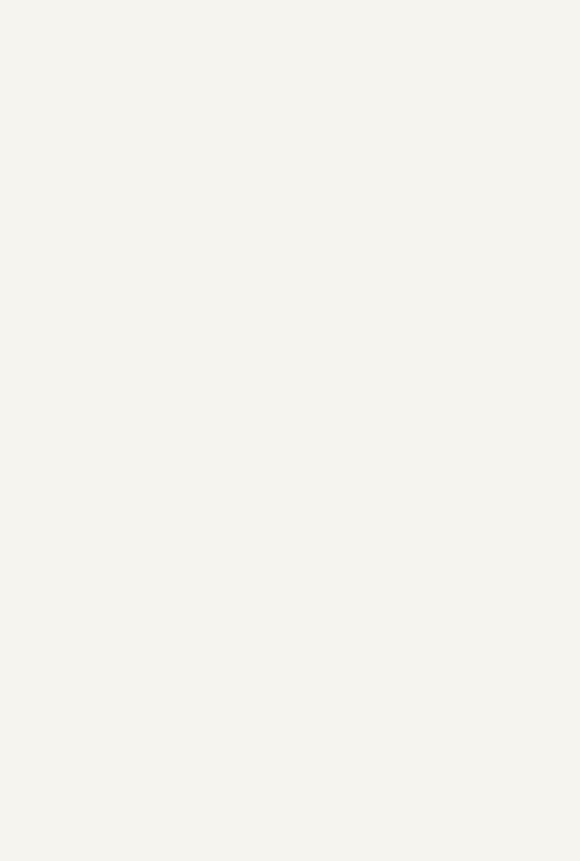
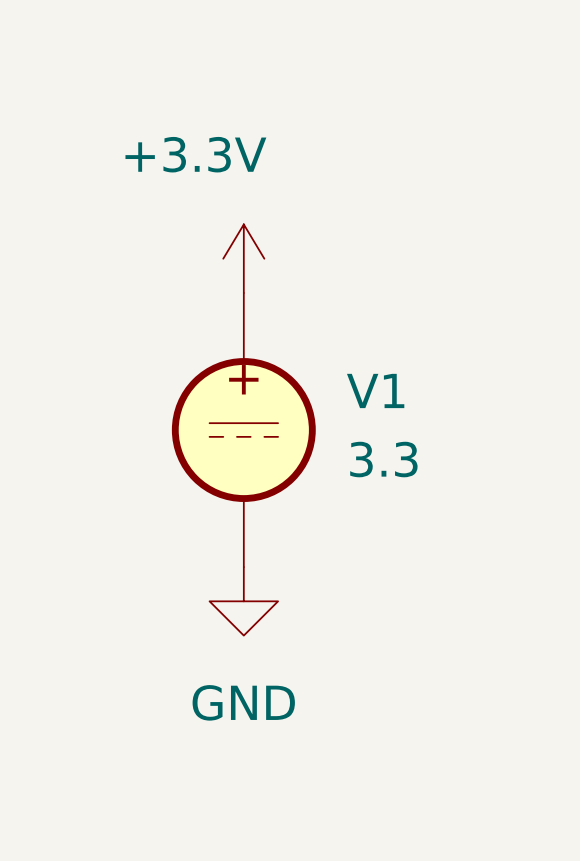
power symbol: none -> +3.3V (243, 258)
V1: none -> 3.3 (243, 430)
power symbol: none -> GND (243, 601)

